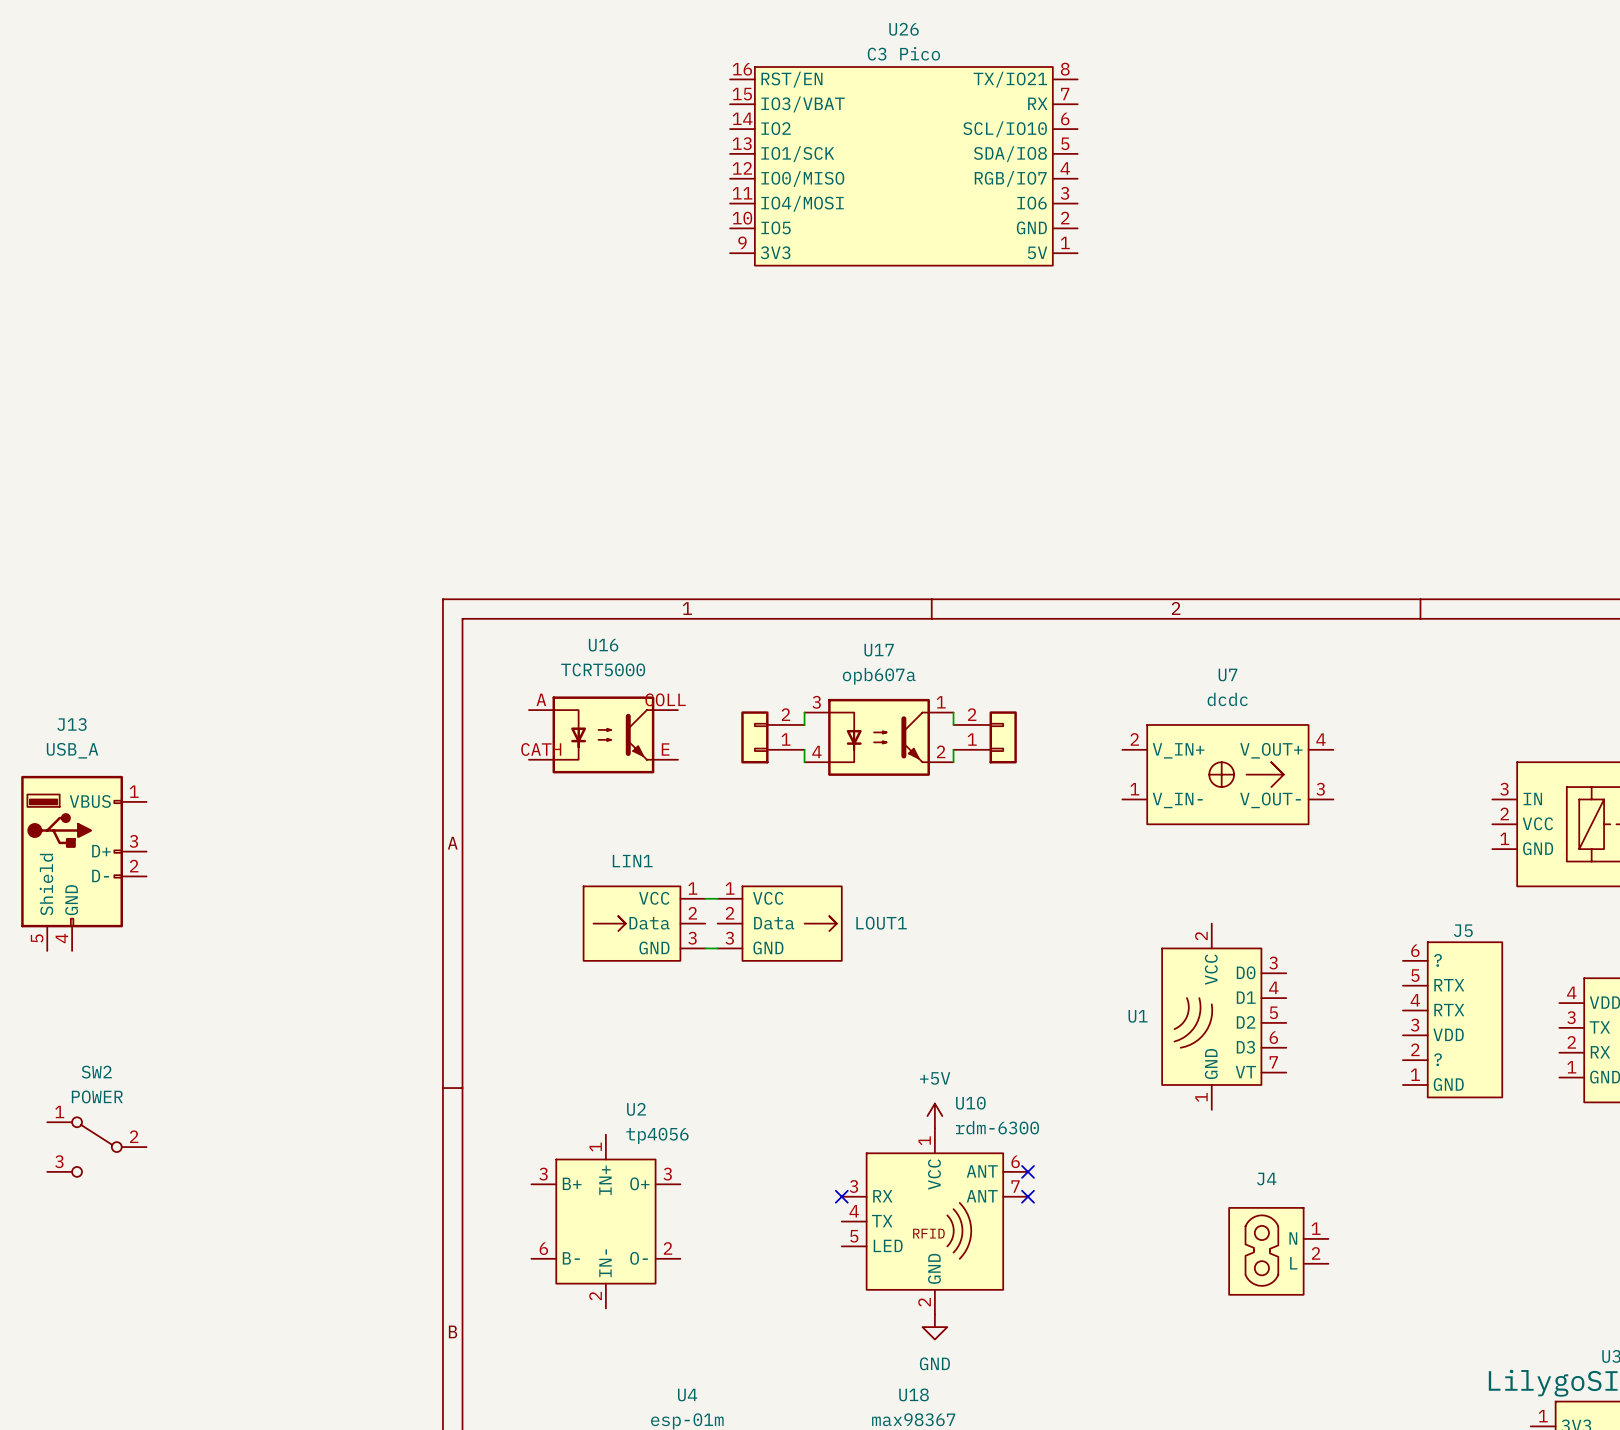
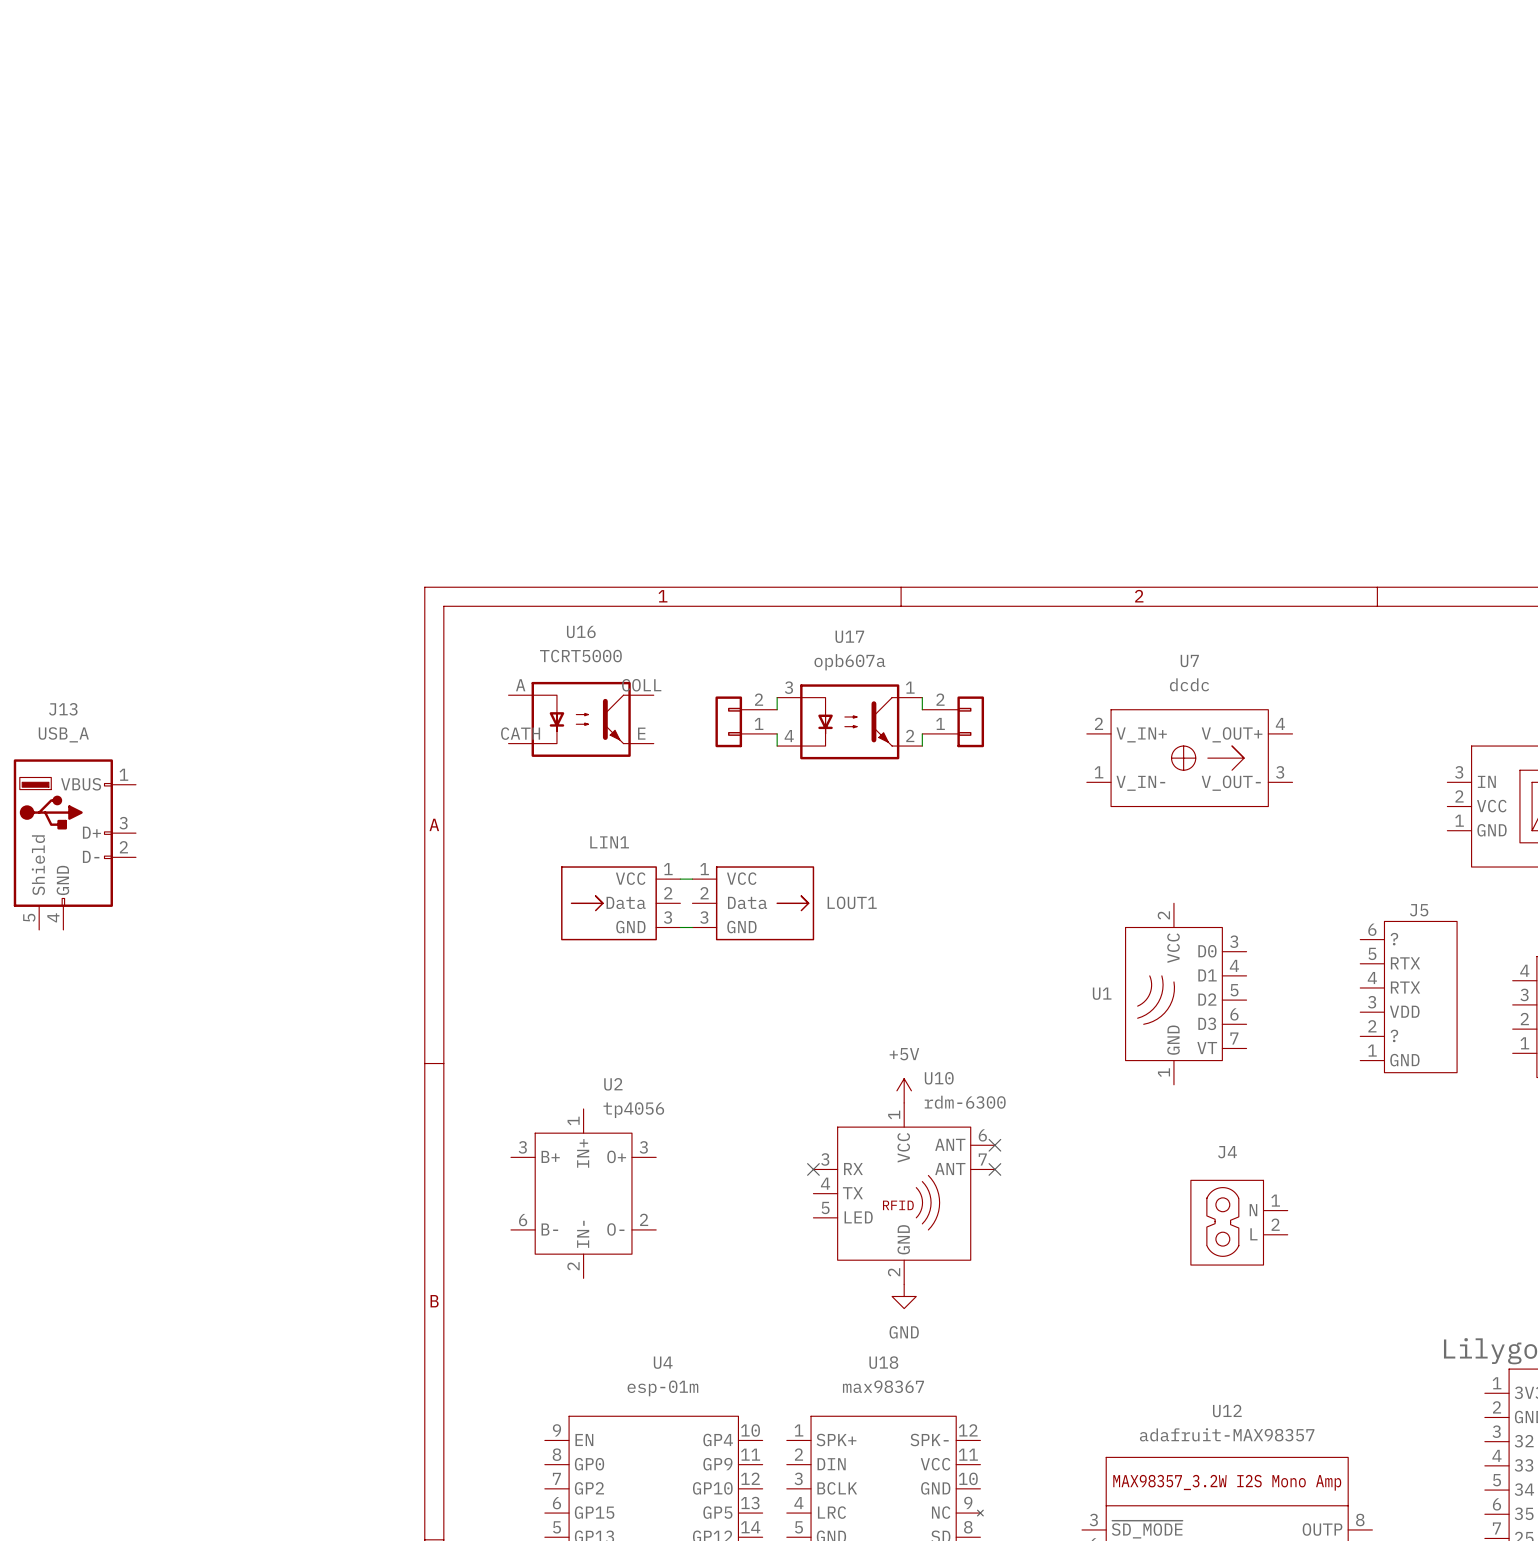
U26: C3 Pico (903, 166) -> none
SW2: POWER (96, 1147) -> none

